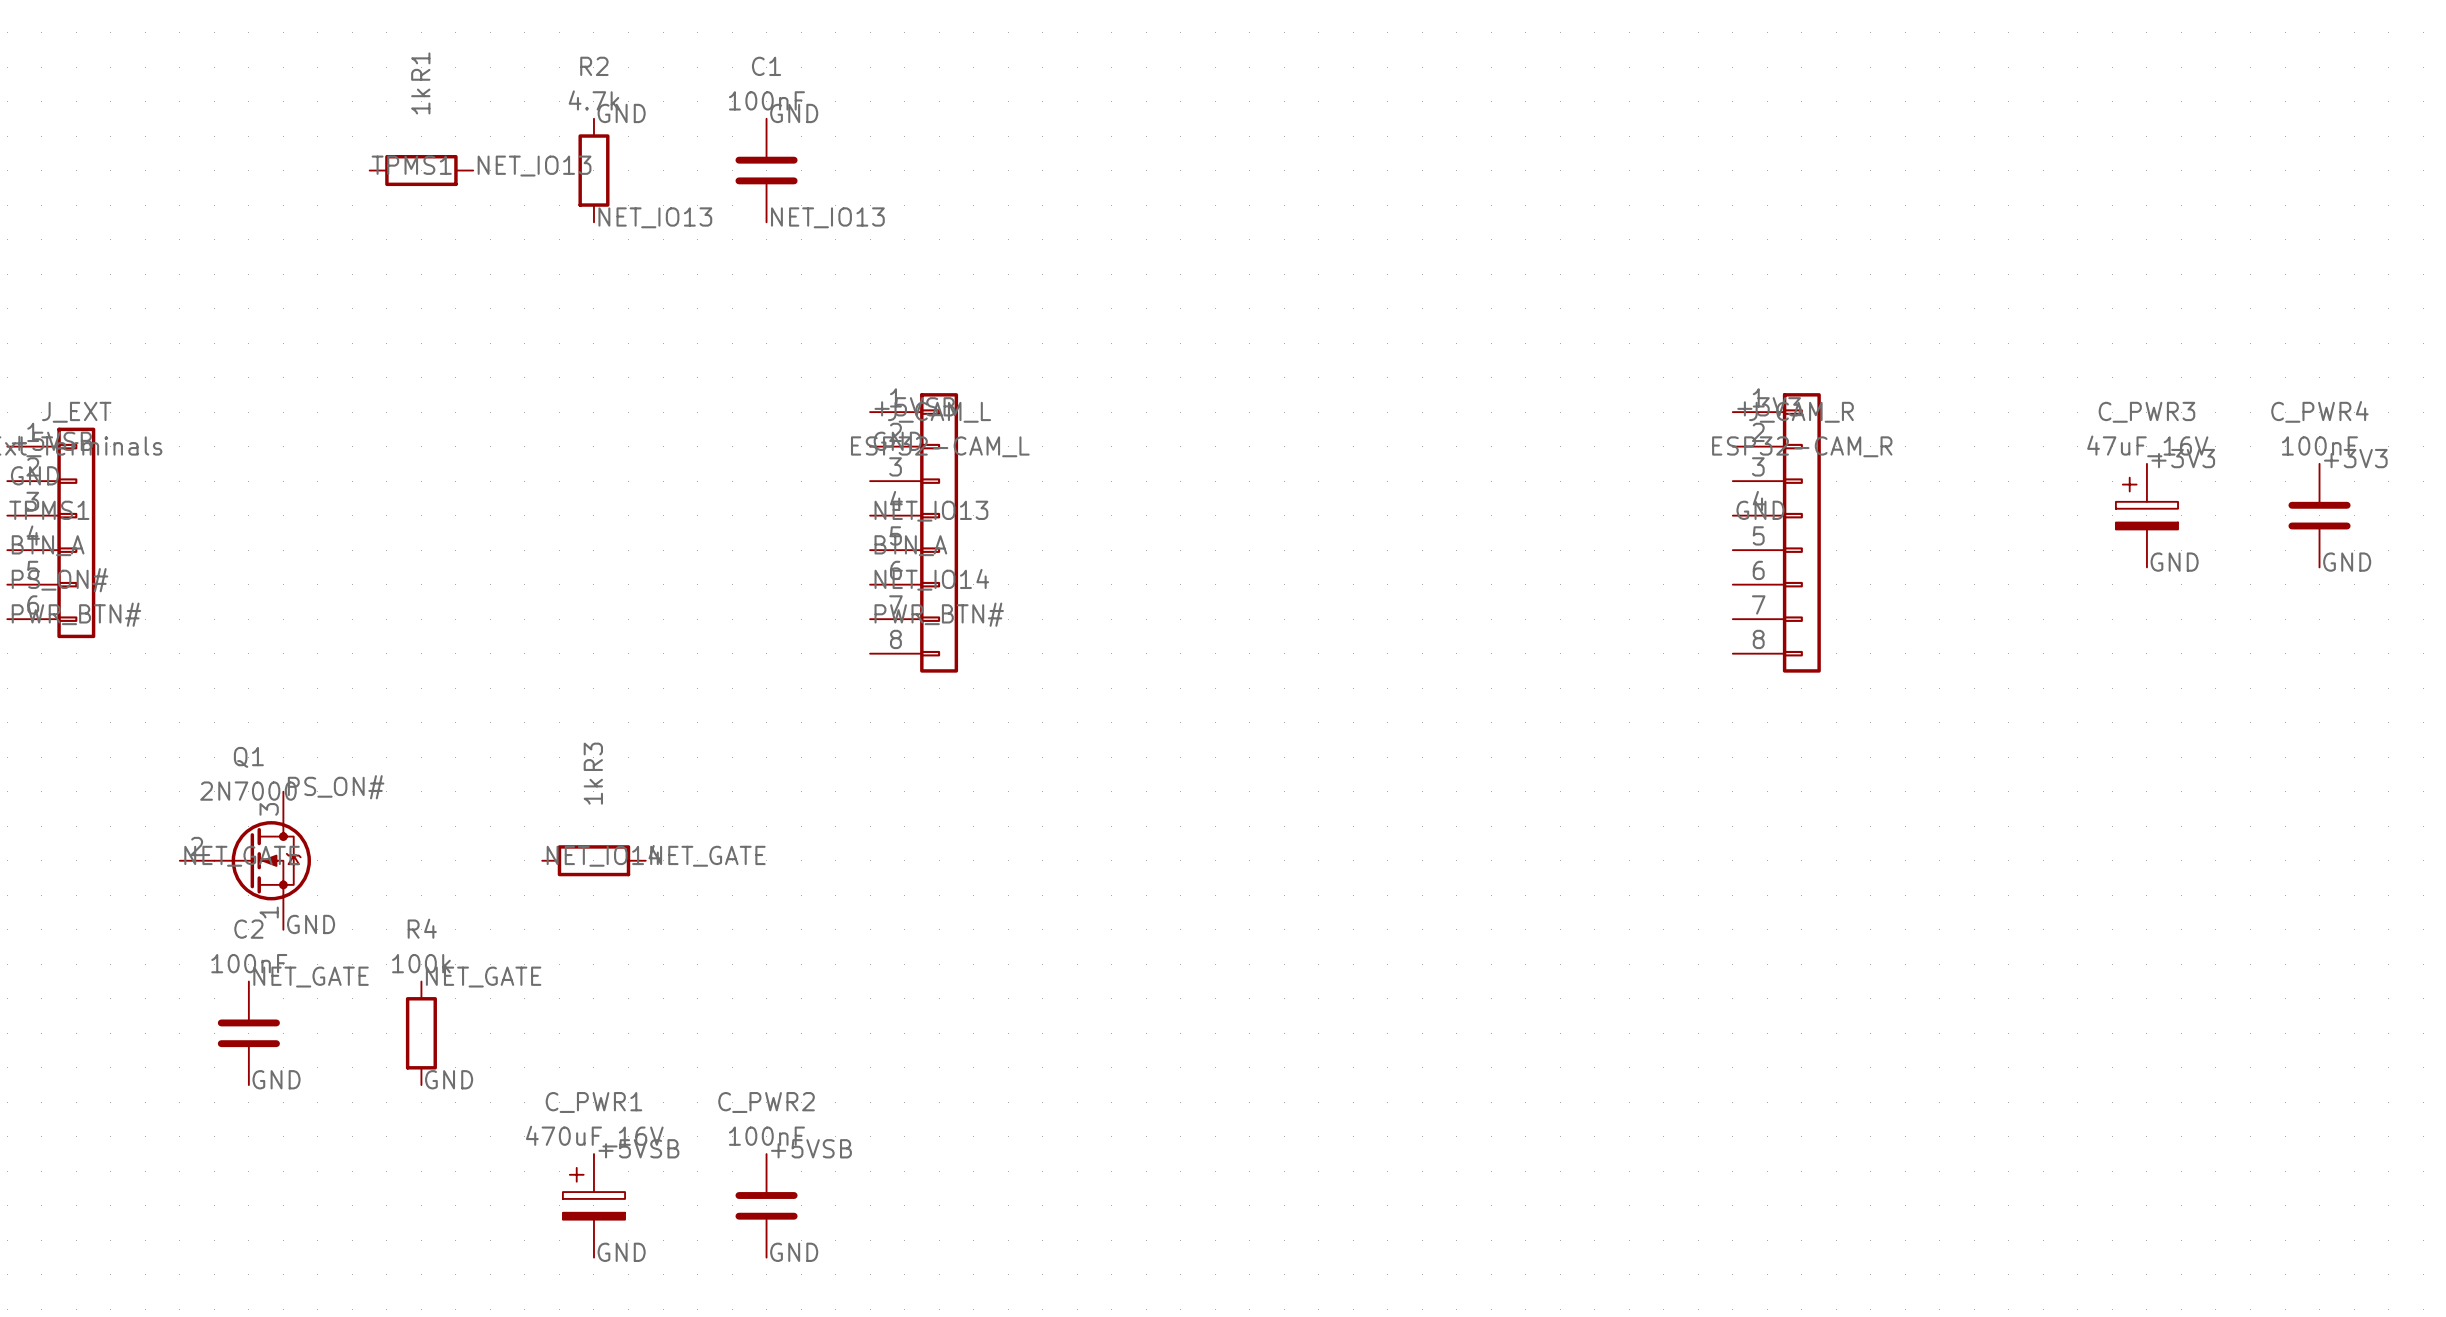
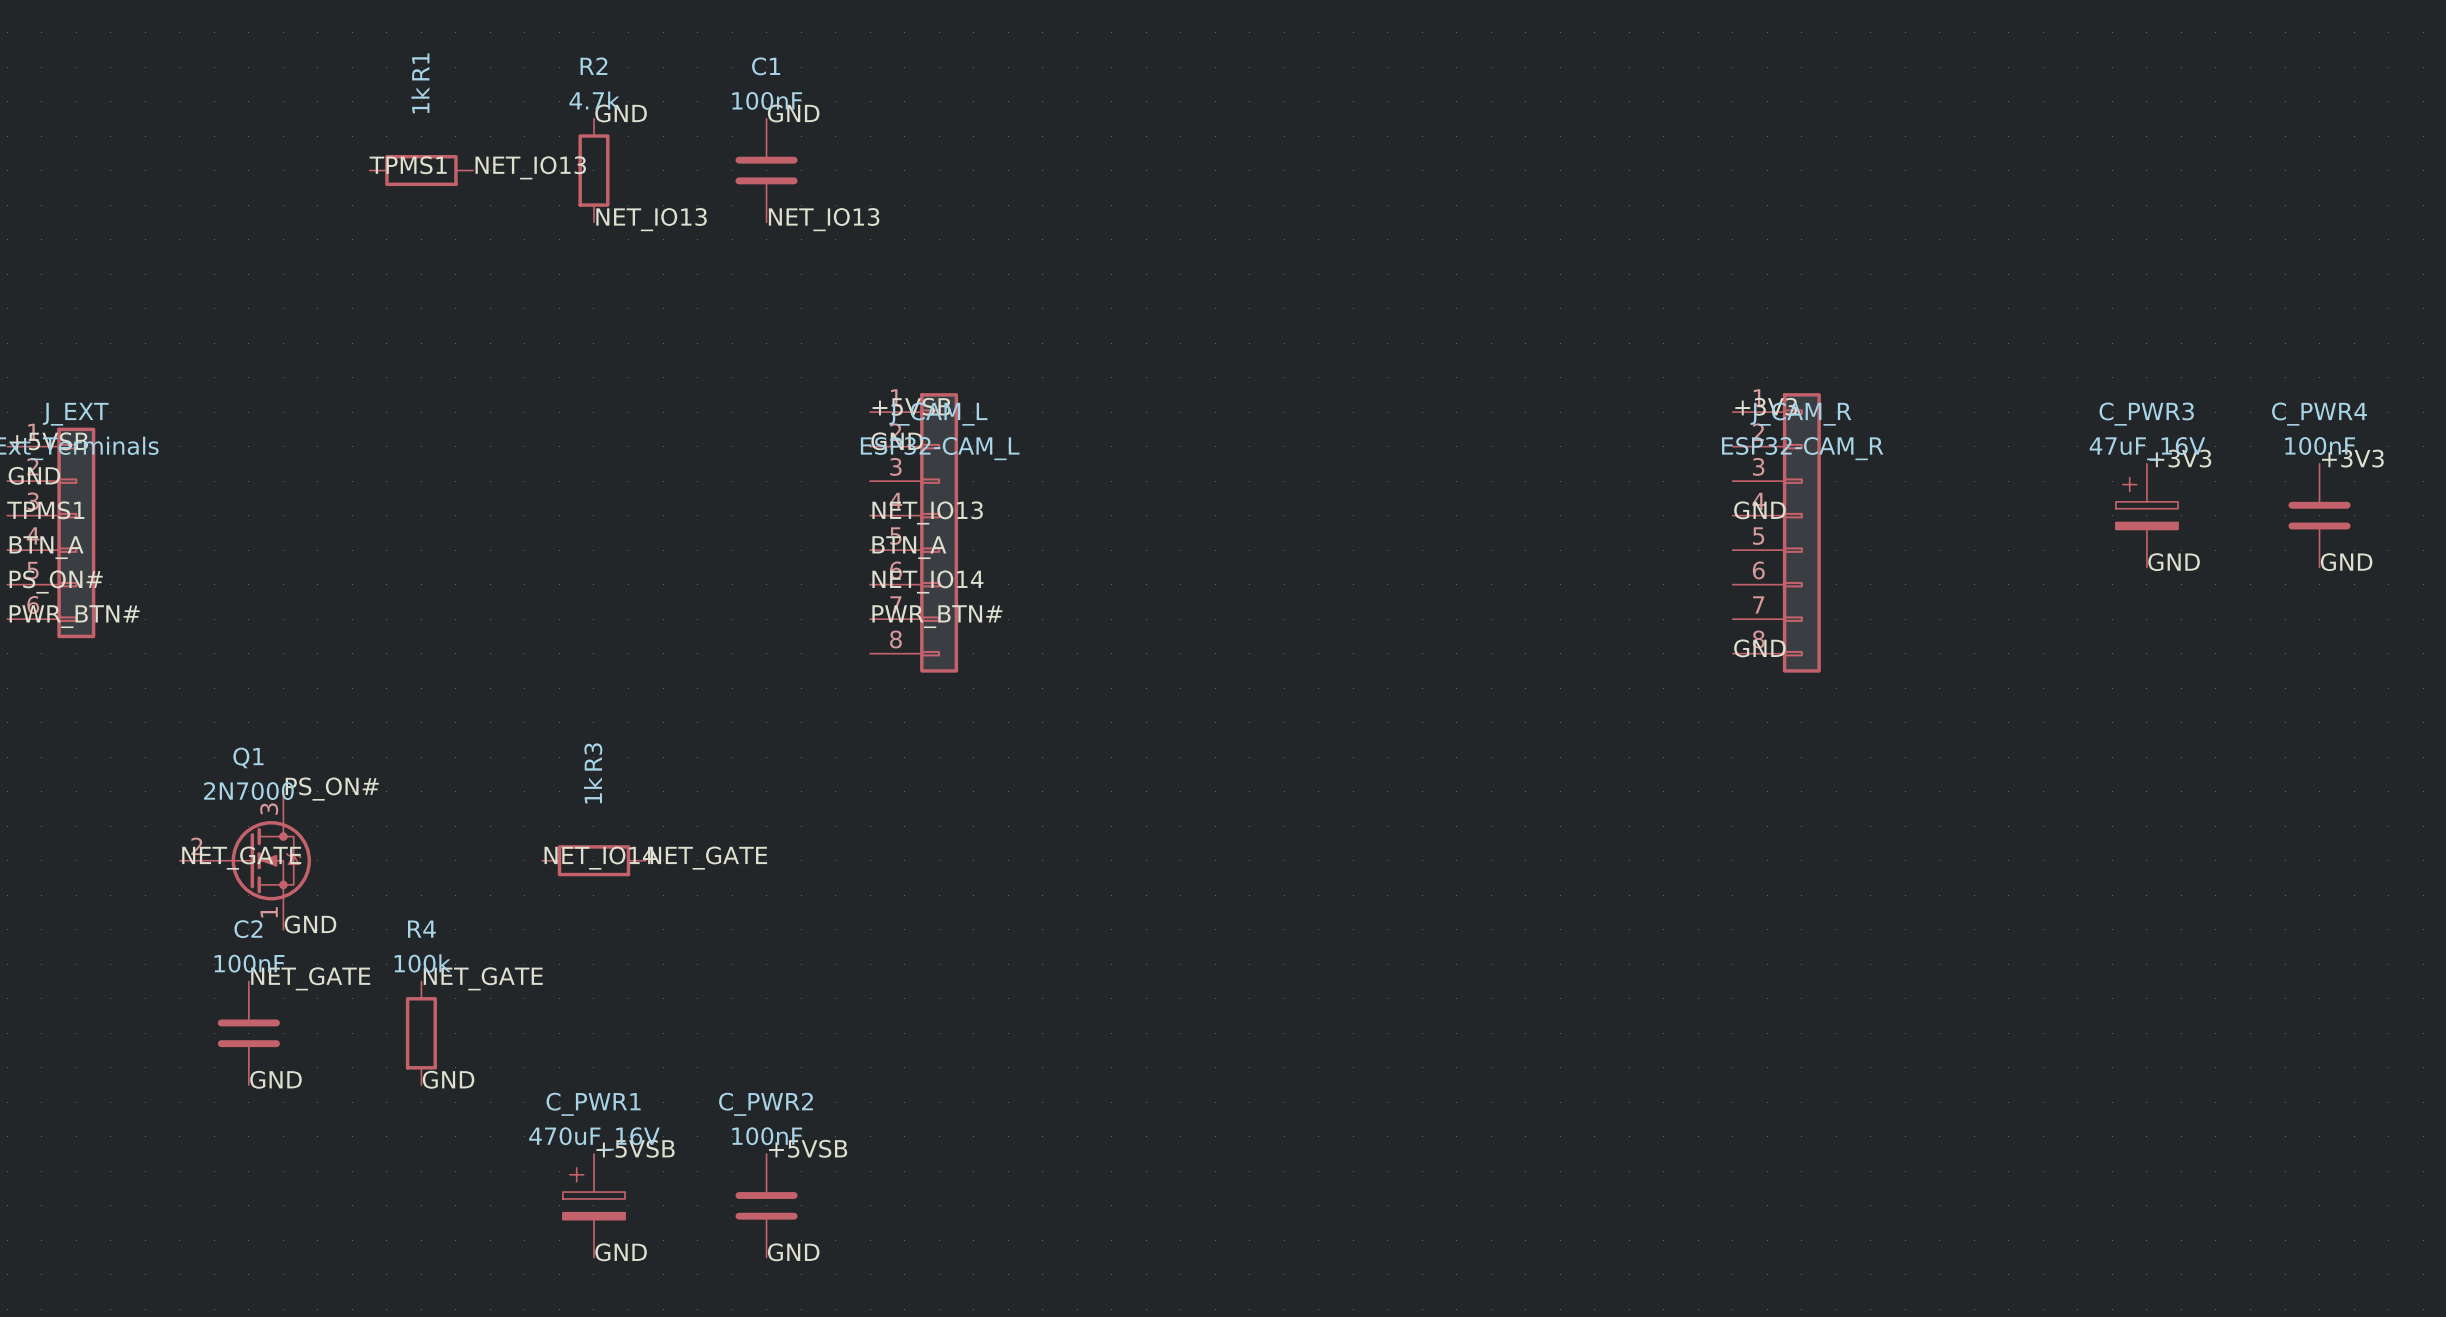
label: none -> GND (1759, 648)

